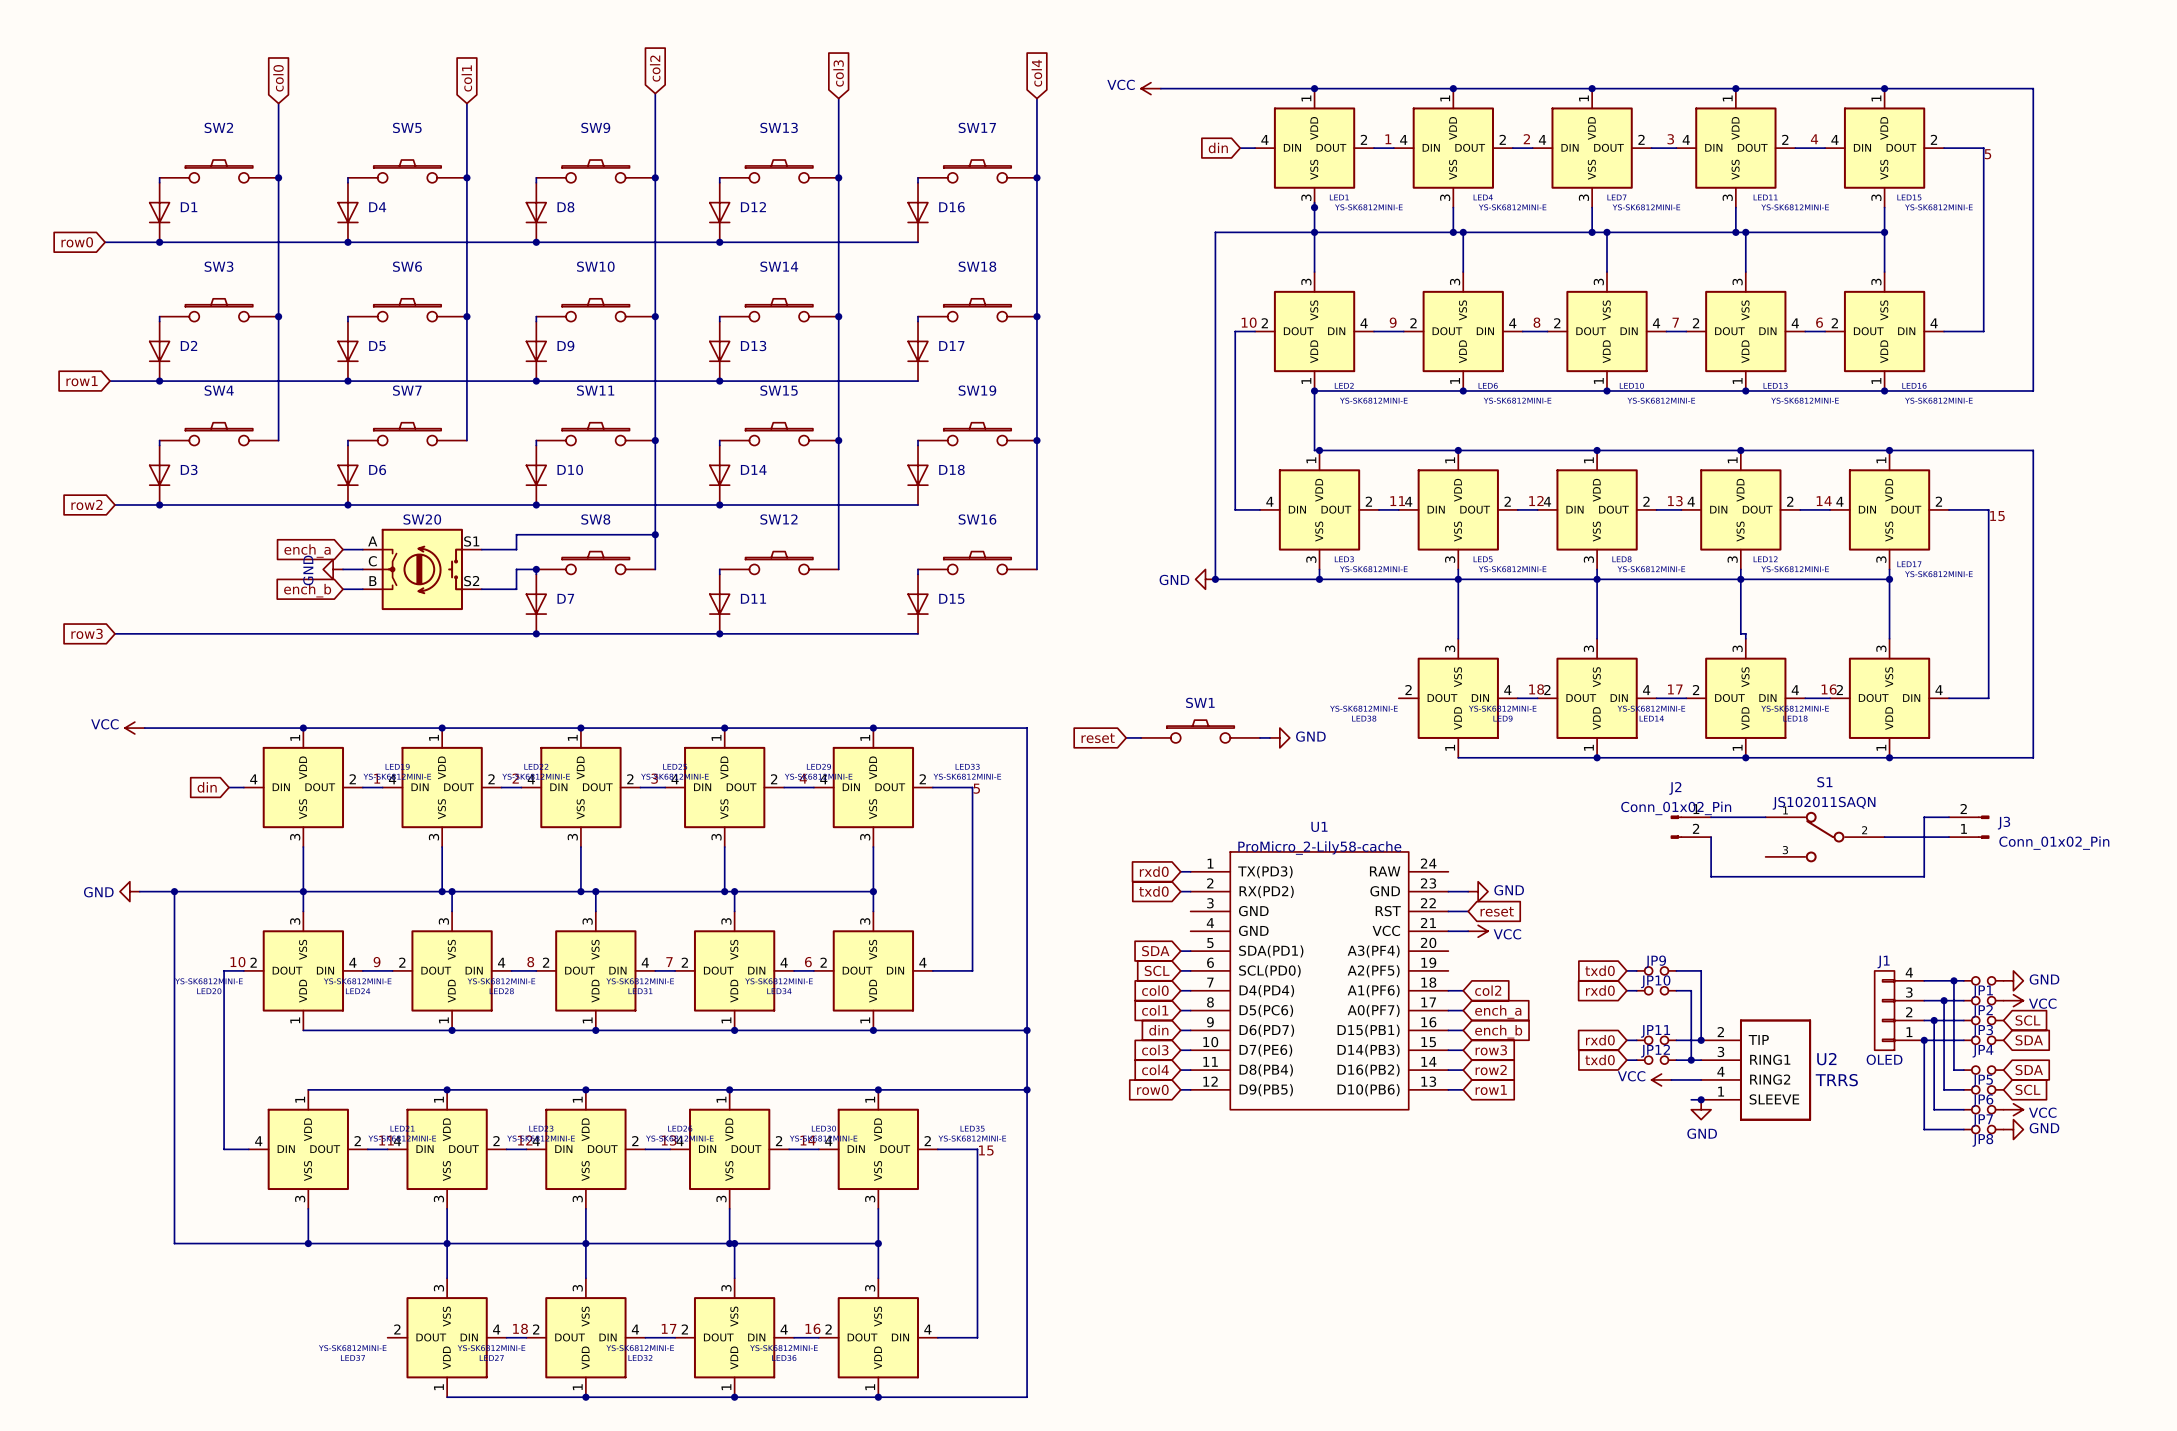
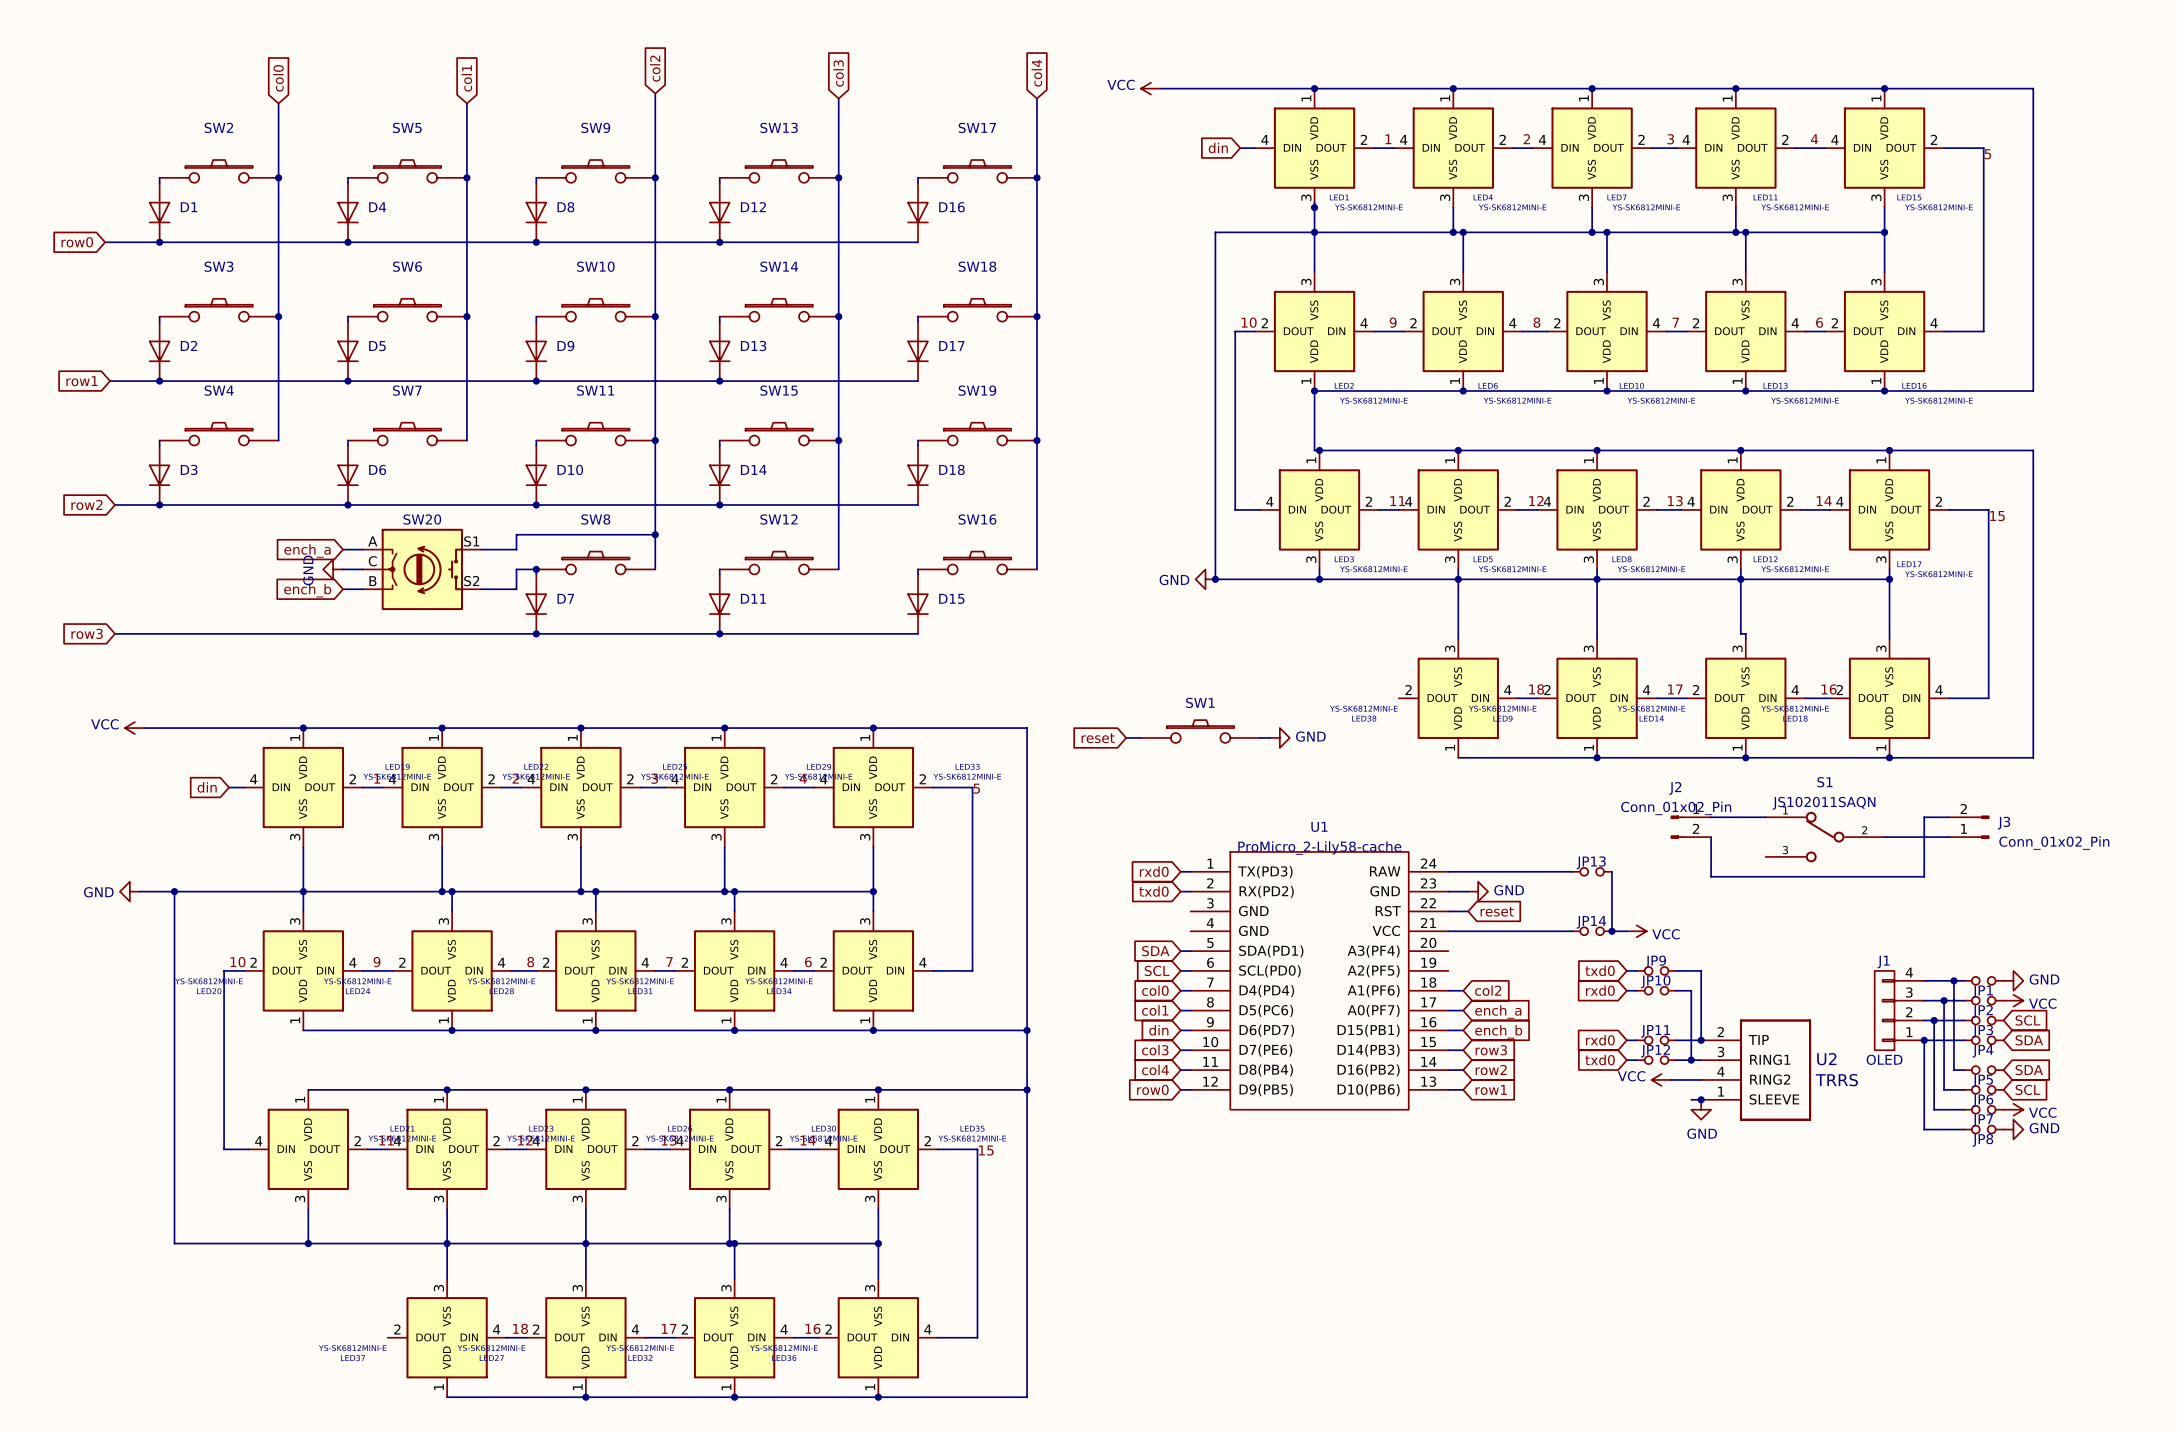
wire: none -> (1448, 871) (1572, 871)
JP13: none -> (1592, 871)
wire: none -> (1611, 871) (1611, 931) (1626, 931)
wire: none -> (1468, 931) (1572, 931)
power symbol position: VCC (1478, 931) -> VCC (1636, 931)
JP14: none -> (1592, 931)
junction: none -> (1611, 931)

